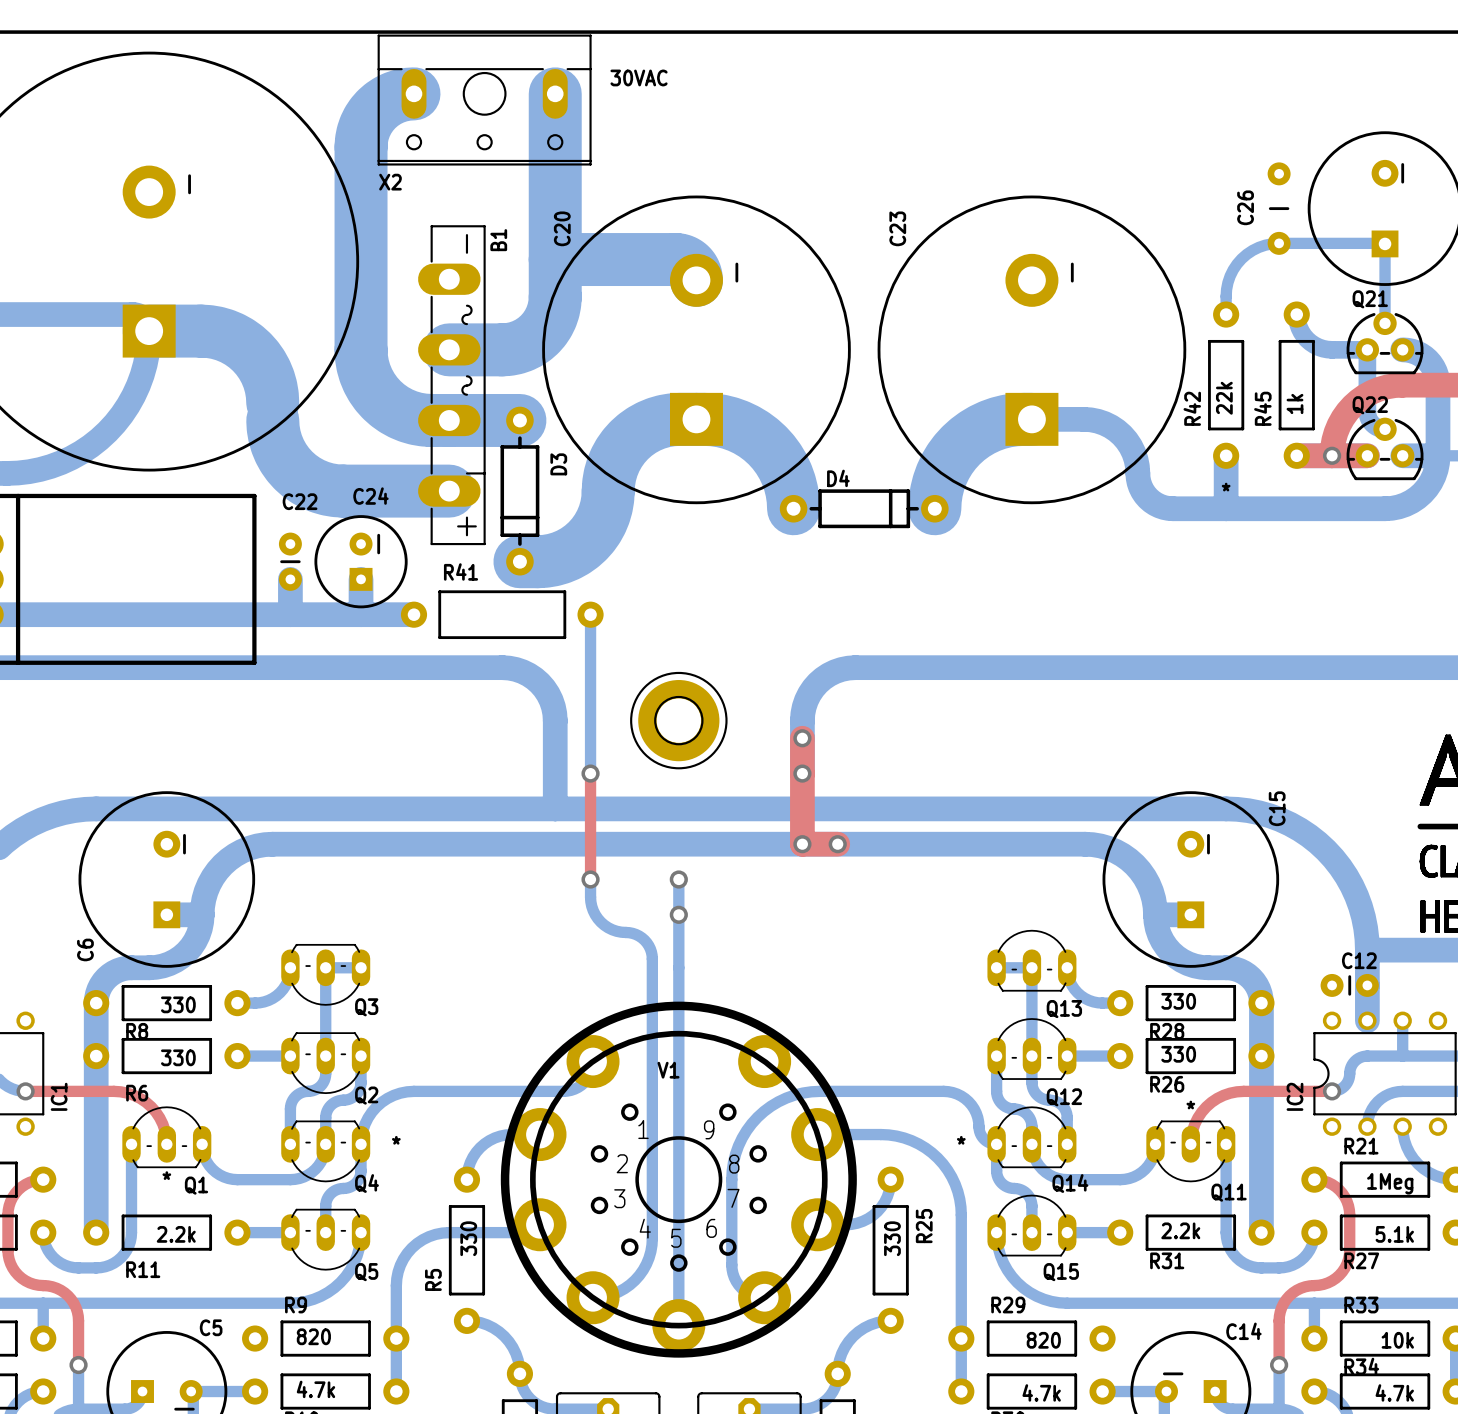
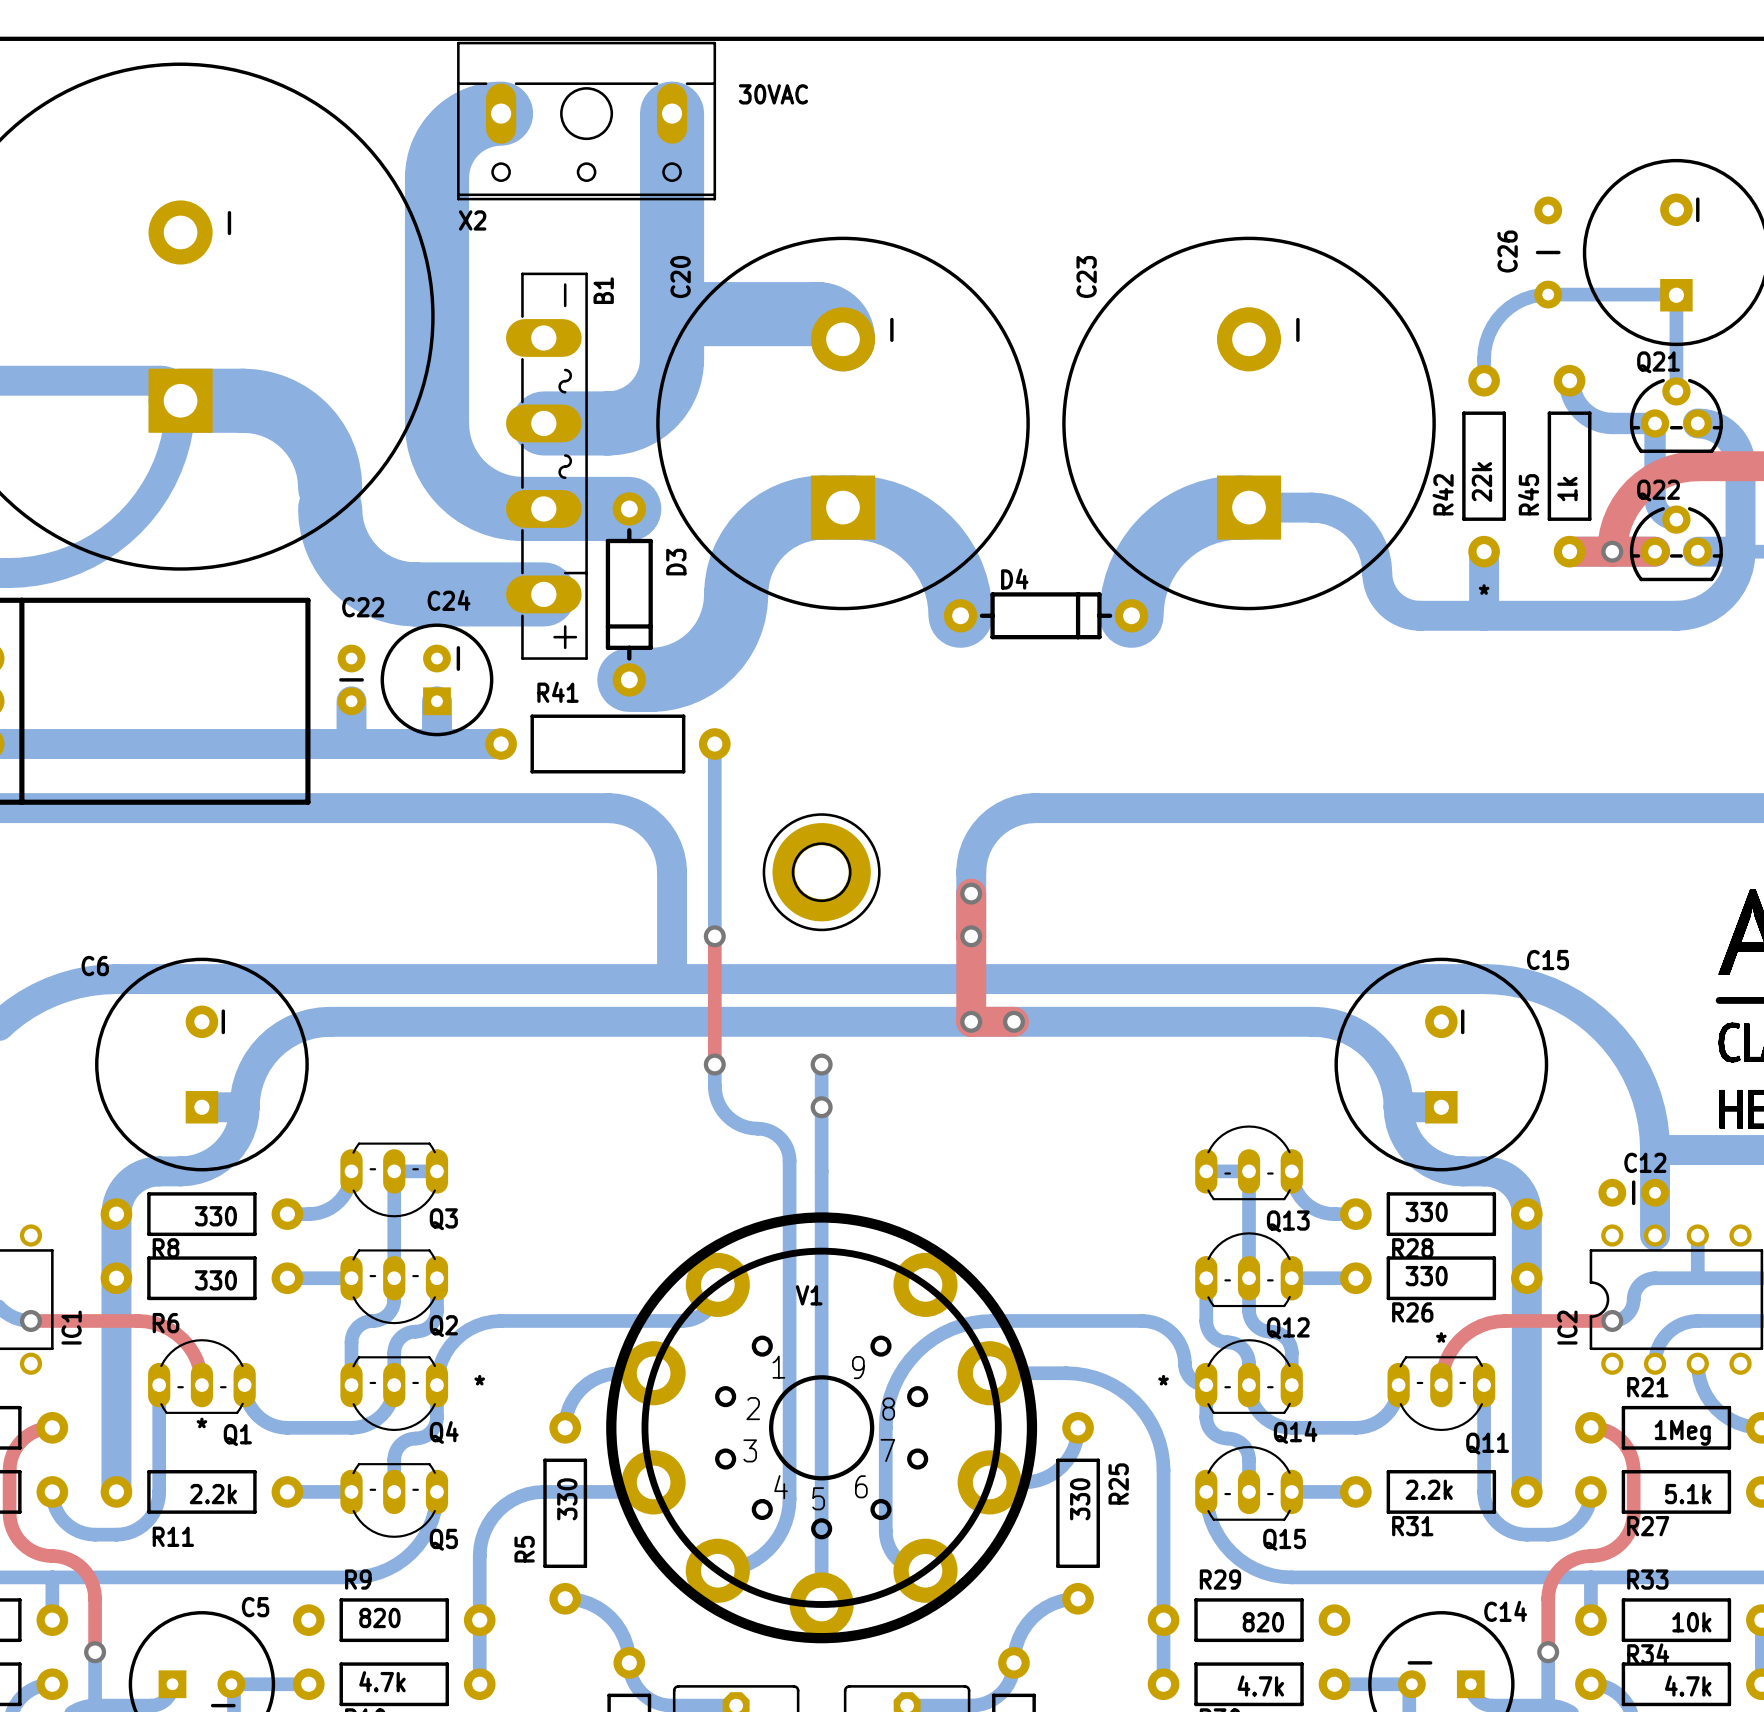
C15 name rotation: 0° (1277, 808) -> 90° clockwise (1547, 960)
C6 name rotation: 0° (85, 949) -> 90° clockwise (95, 966)
C6 name position: C6 (85, 949) -> C6 (95, 966)

